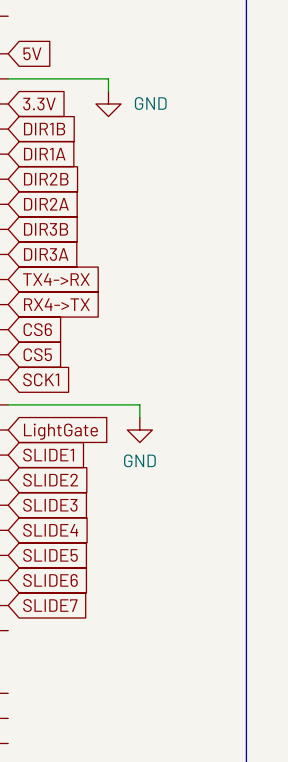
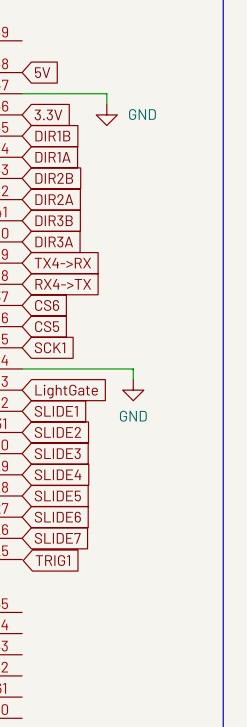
global label: none -> TRIG1 (52, 560)

